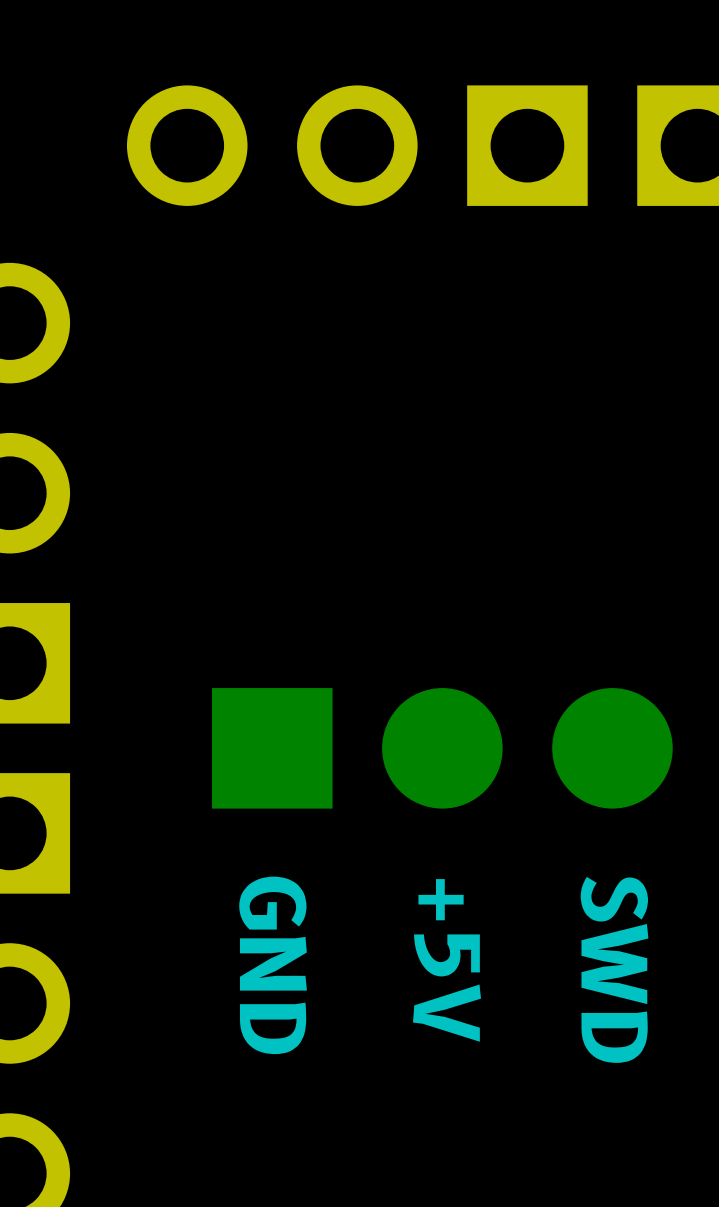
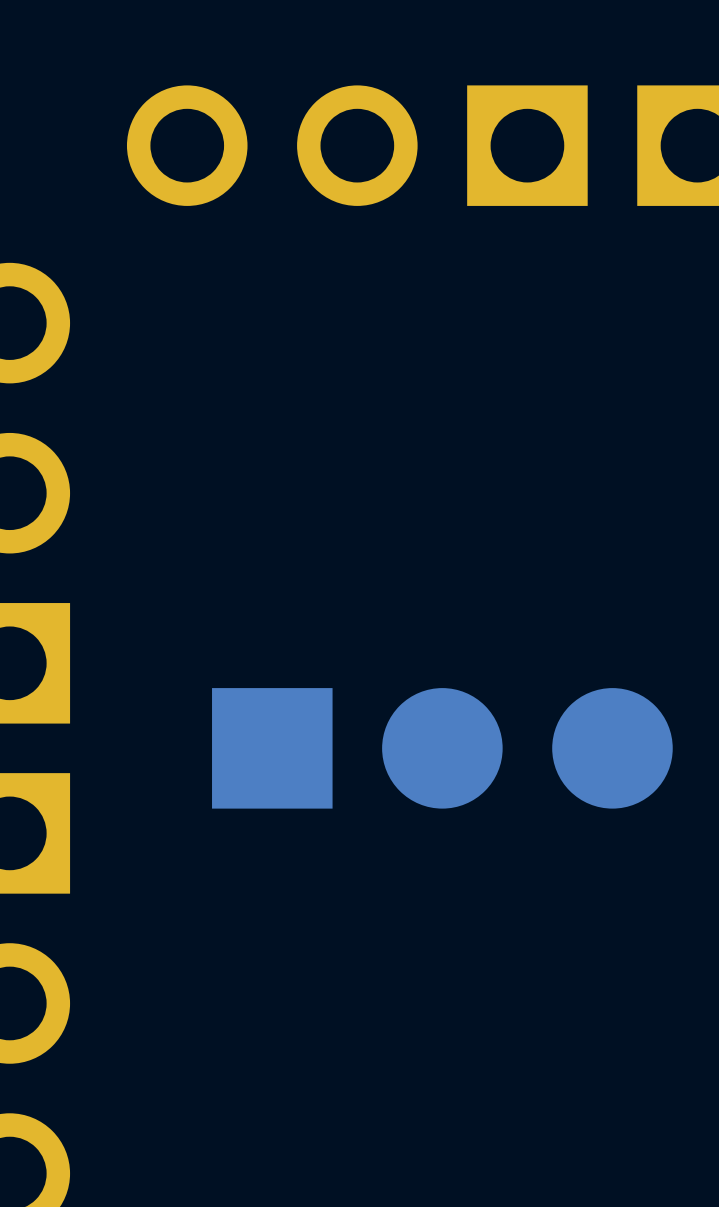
text: +5V (446, 960) -> none
text: GND (273, 965) -> none
text: SWD (614, 969) -> none

